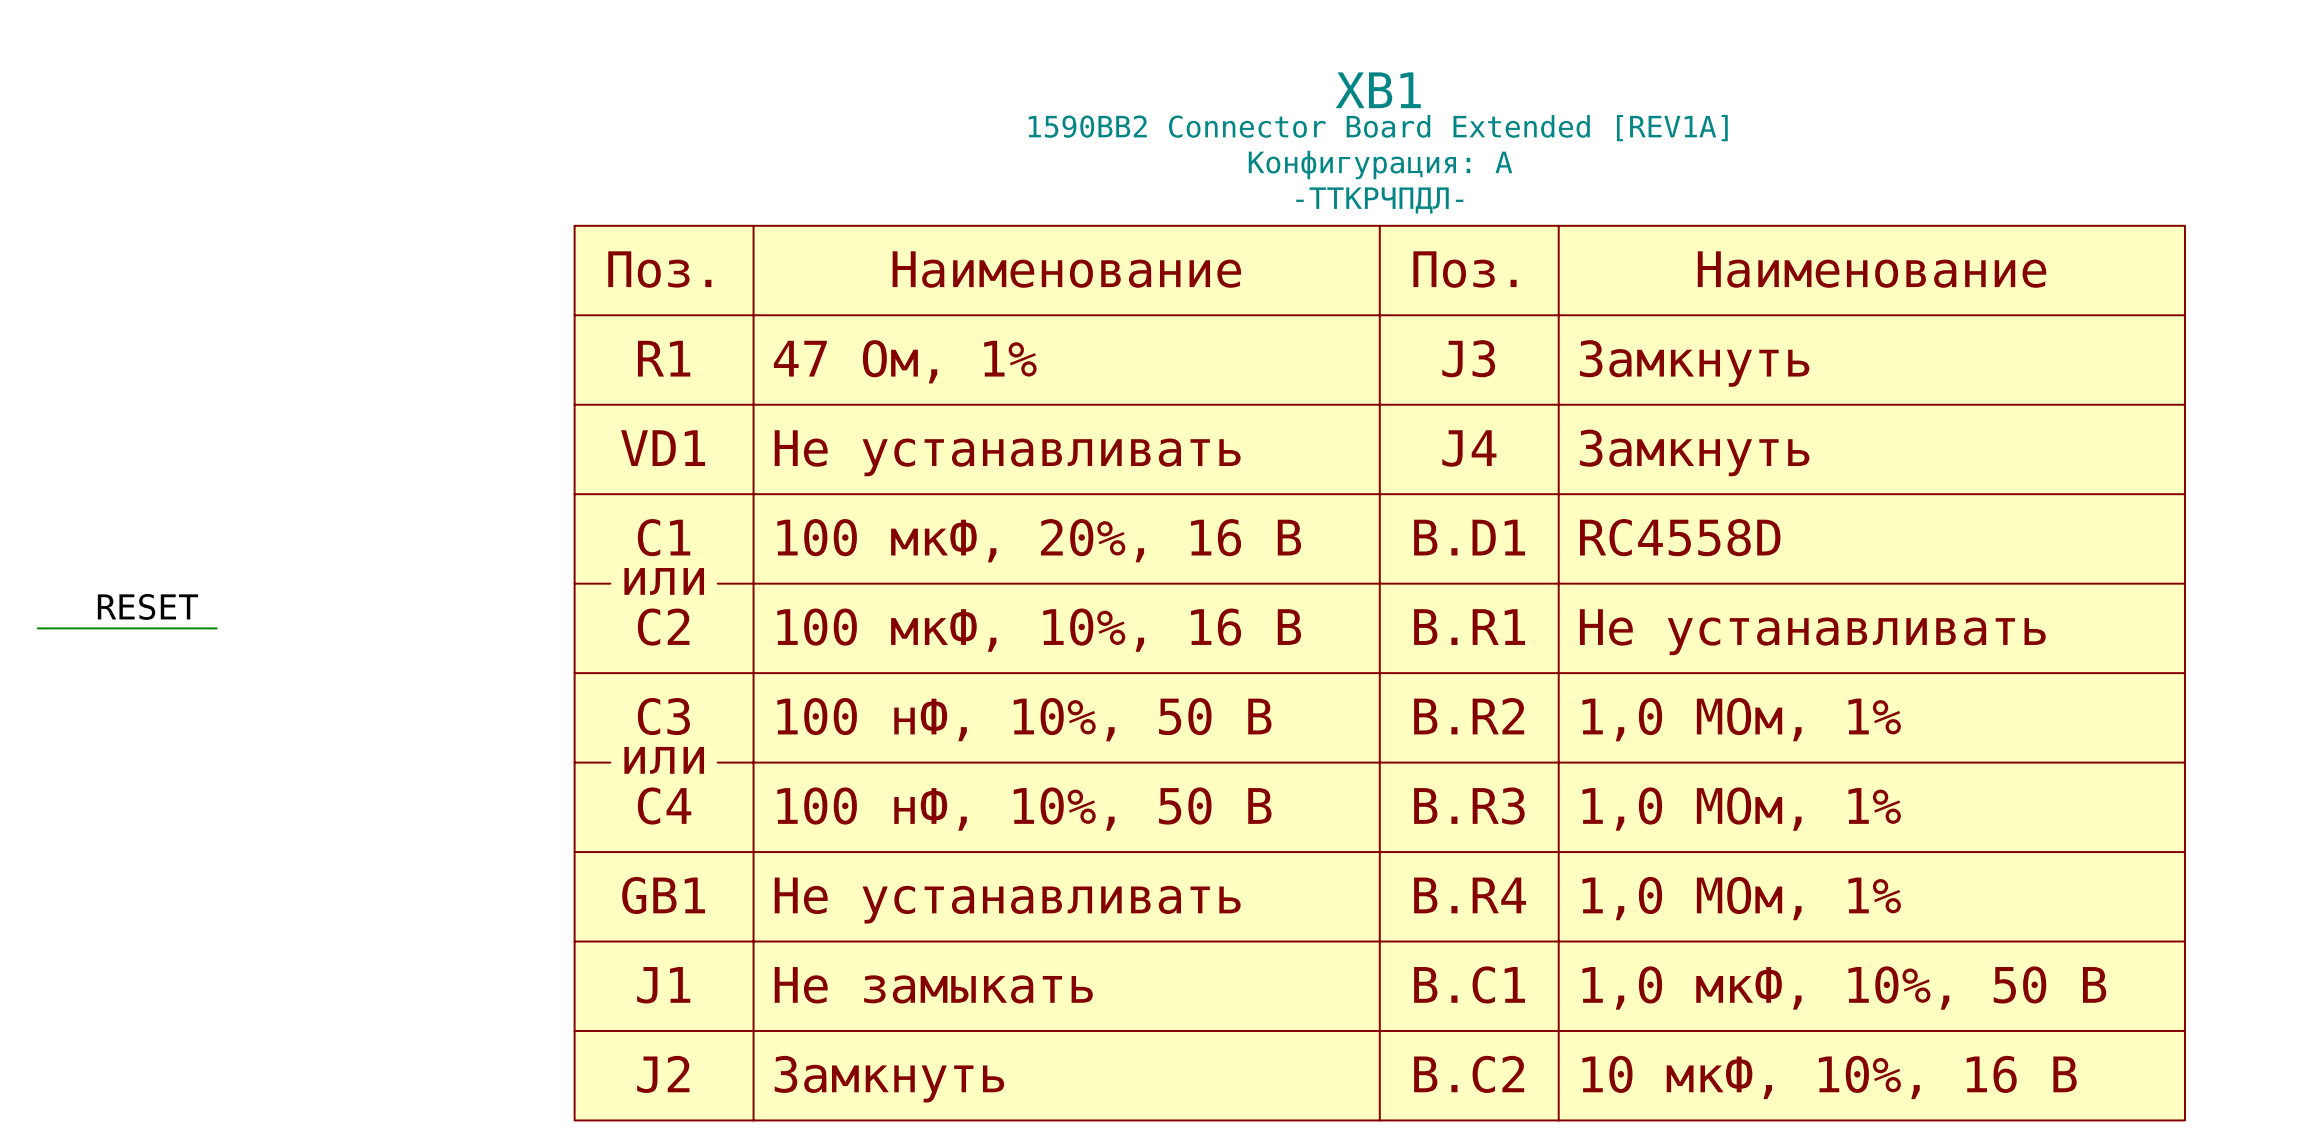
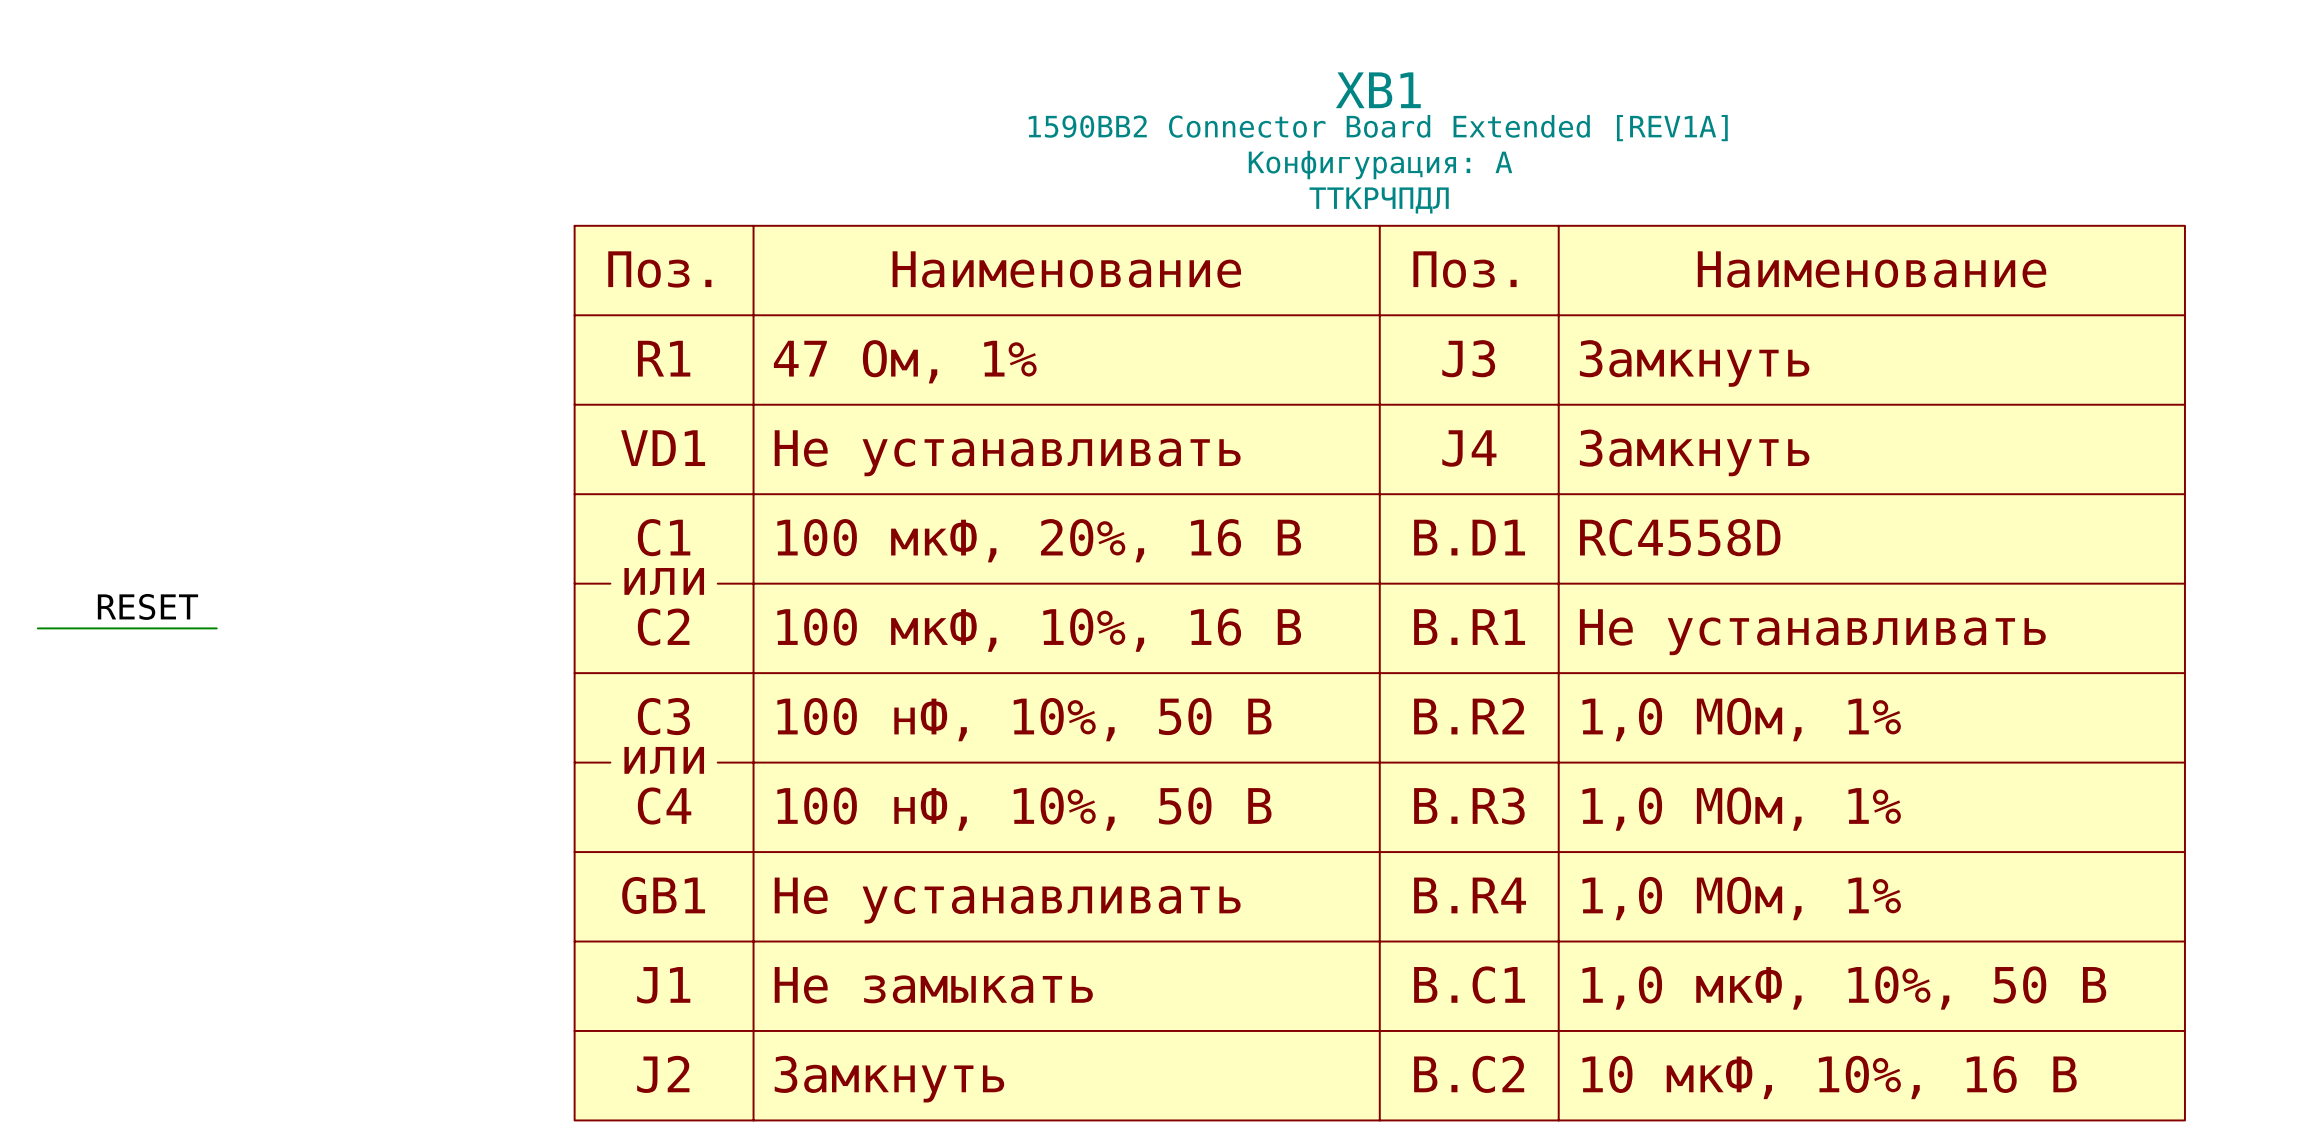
XB1 text: -ТТКРЧПДЛ- (1379, 200) -> ТТКРЧПДЛ (1379, 200)

